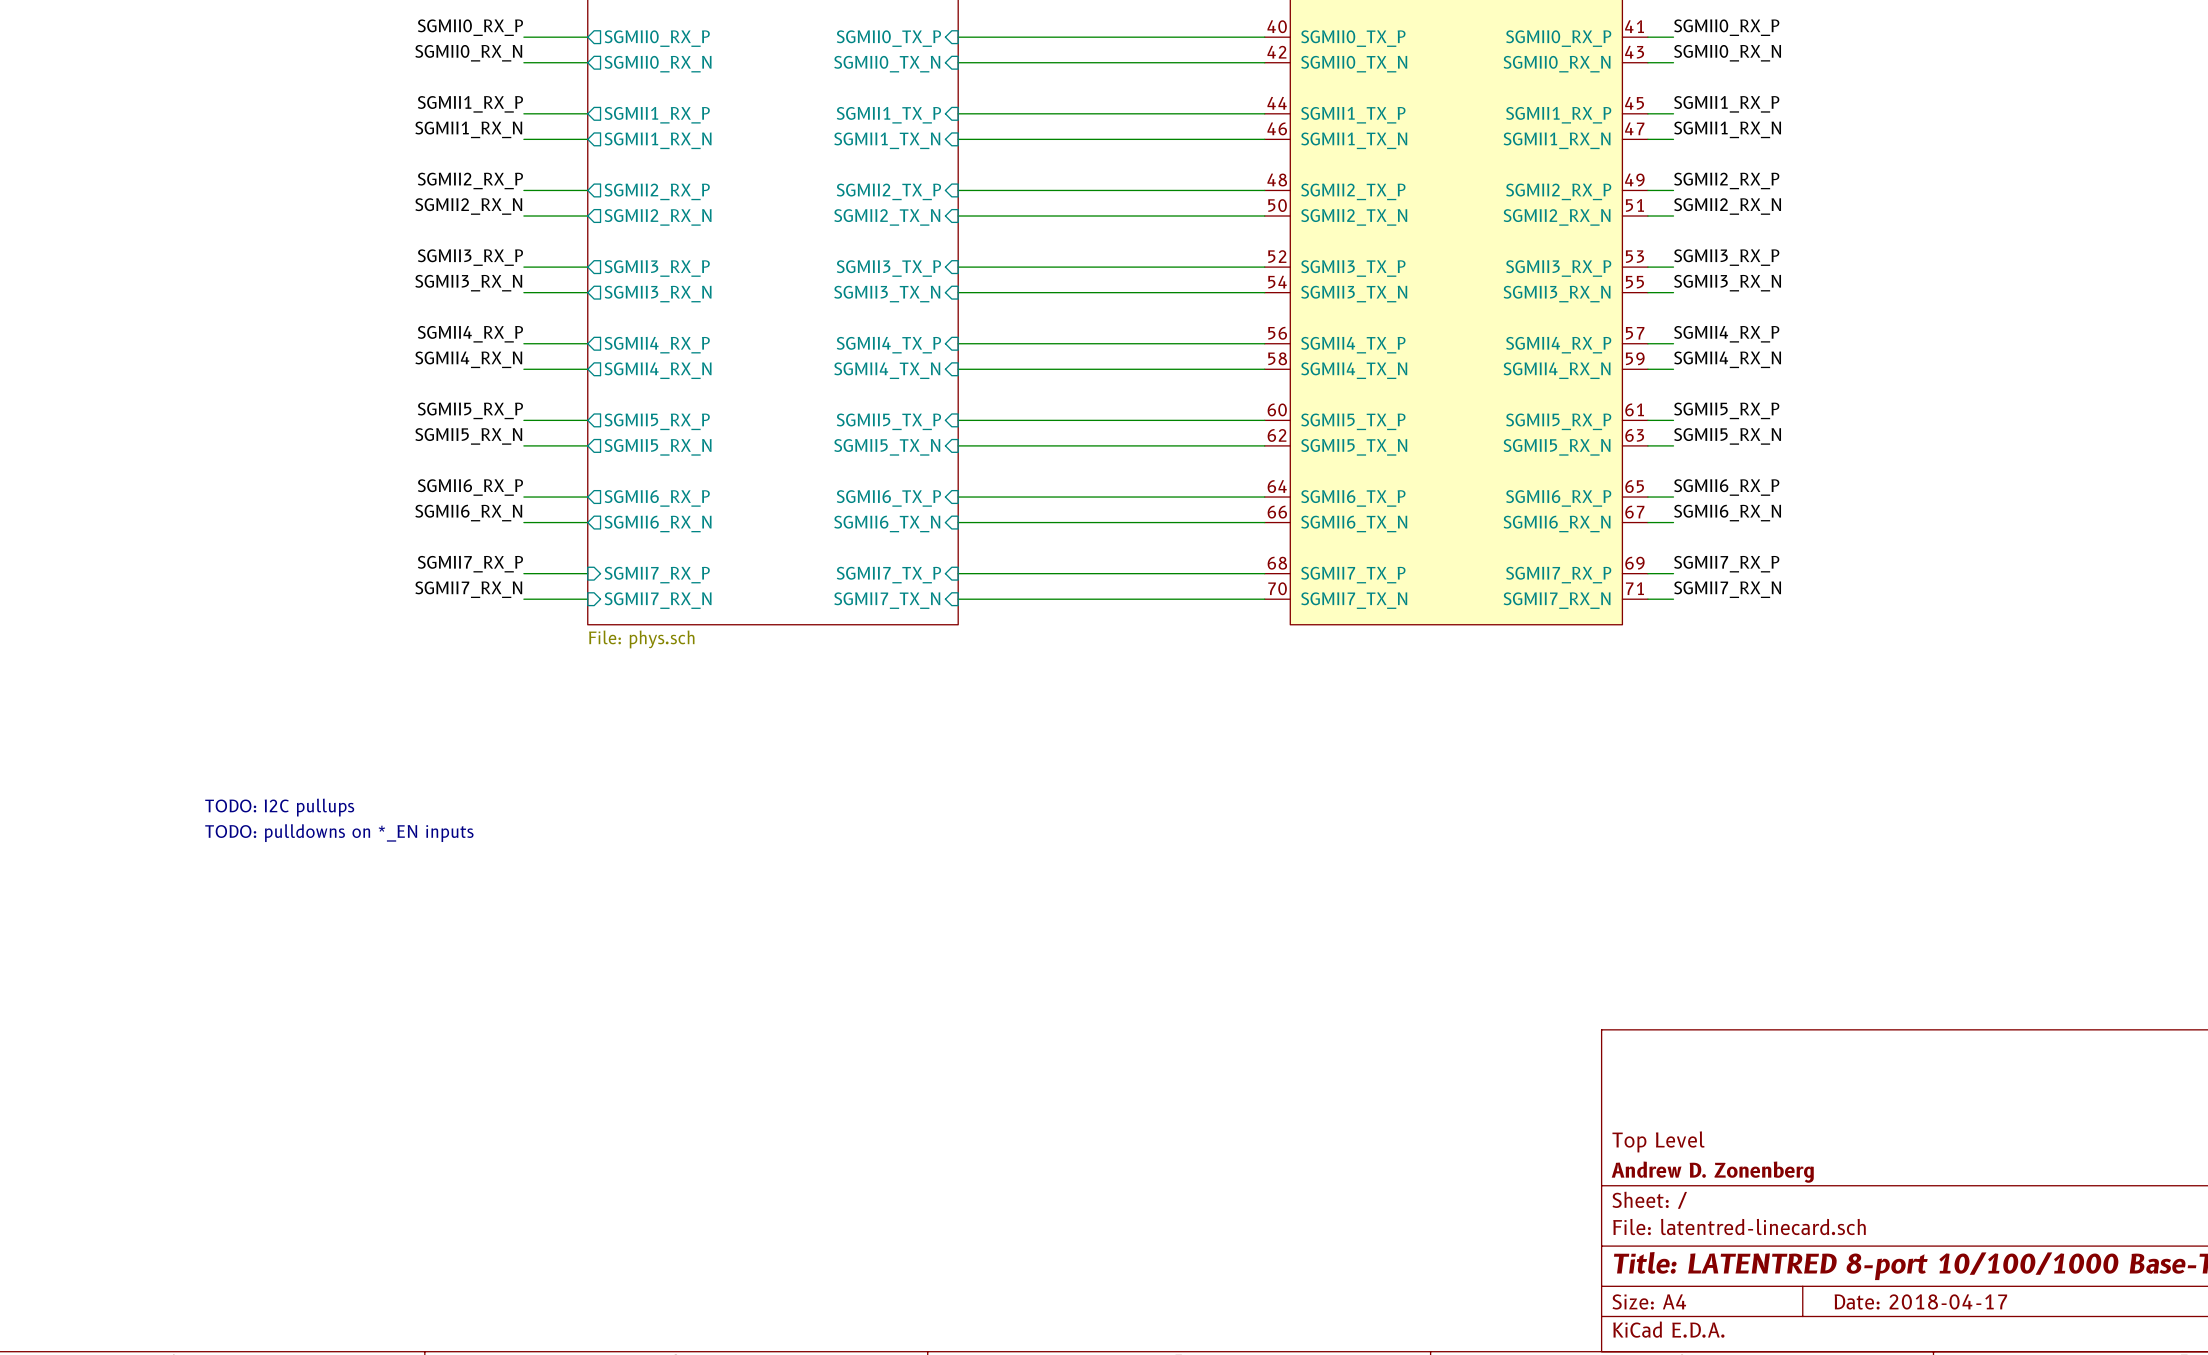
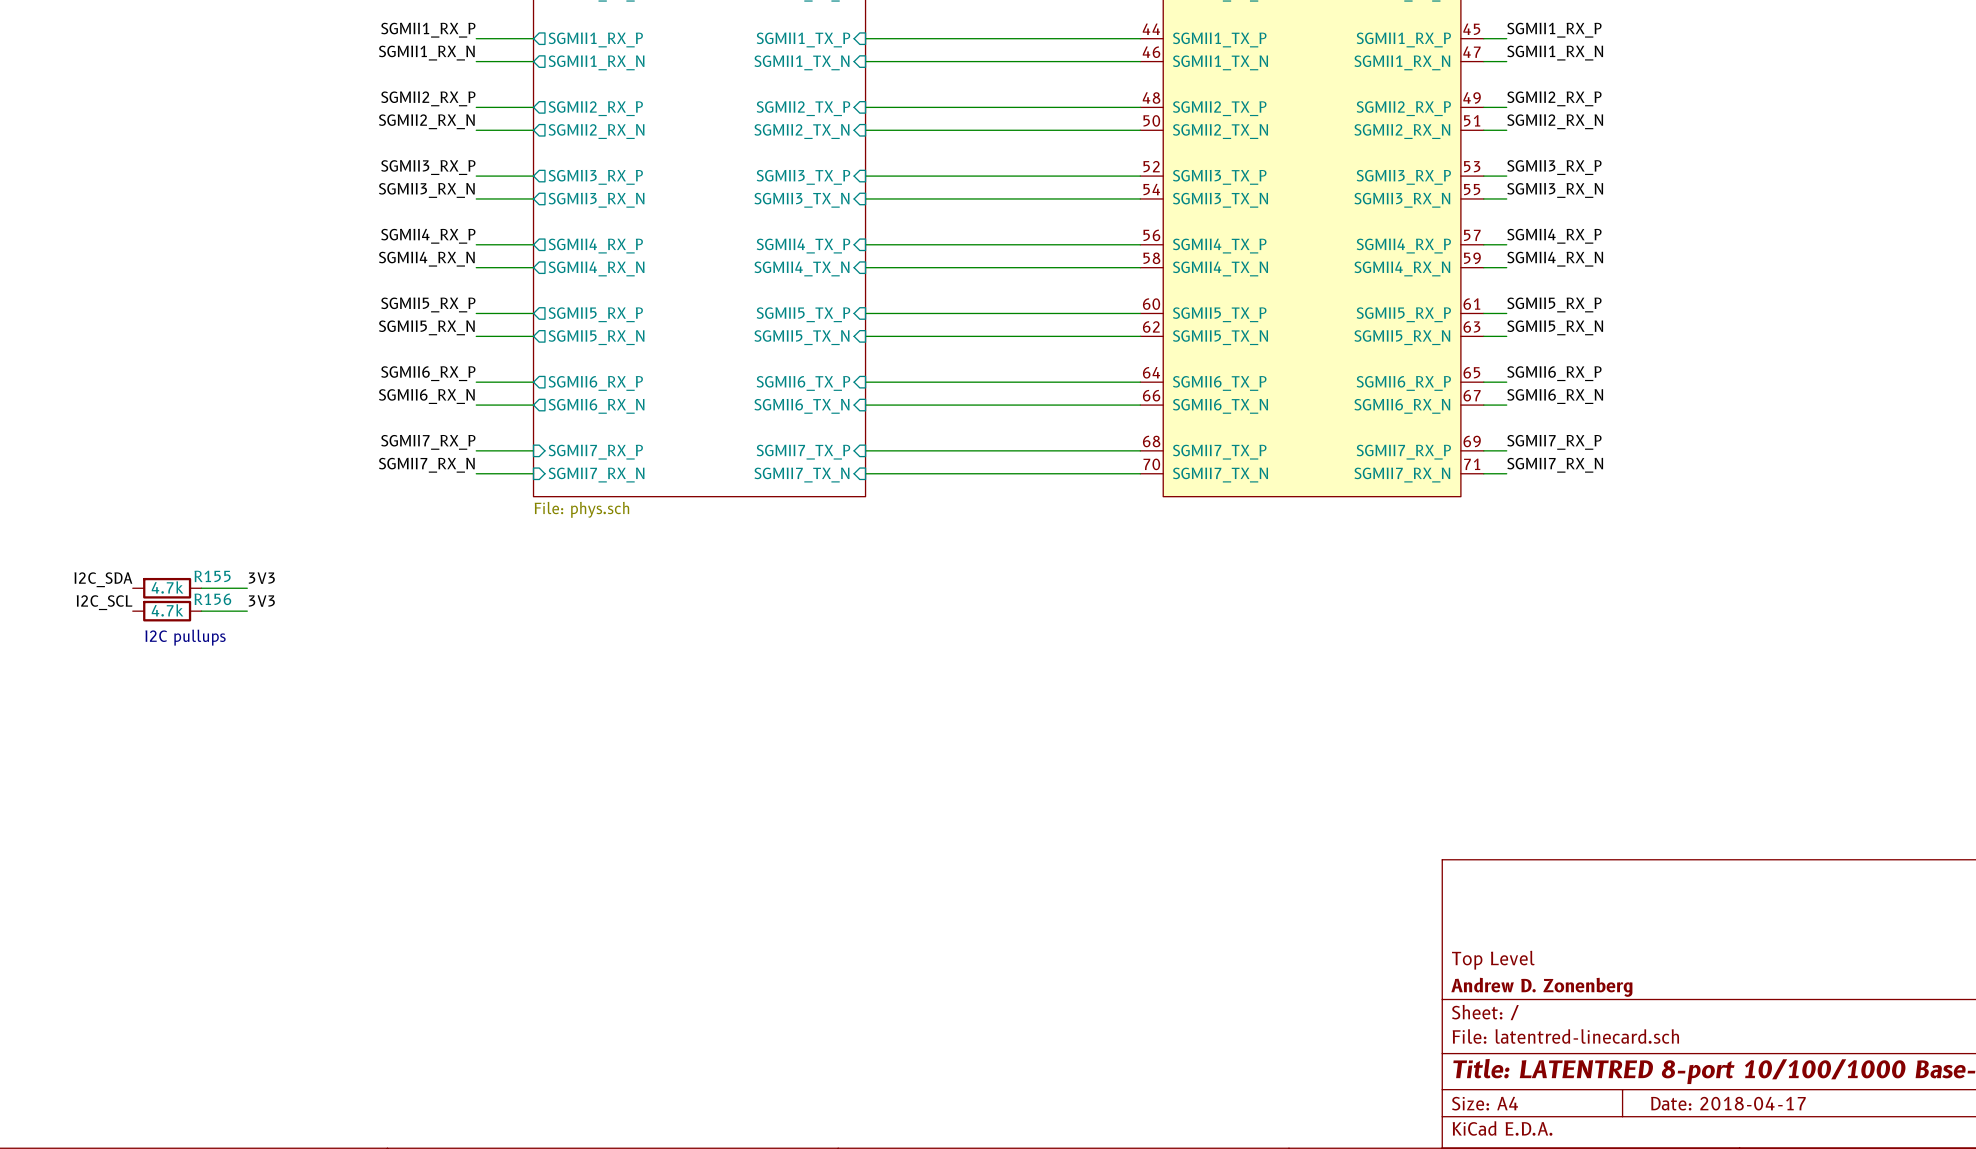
label: none -> 3V3 (261, 578)
label: none -> I2C_SDA (103, 579)
R155: none -> 4.7k (167, 588)
wire: none -> (201, 588) (247, 588)
label: none -> 3V3 (261, 601)
label: none -> I2C_SCL (104, 602)
R156: none -> 4.7k (167, 611)
wire: none -> (201, 611) (247, 611)
text: TODO: I2C pullups (279, 807) -> I2C pullups (185, 637)
text: TODO: pulldowns on *_EN inputs (339, 833) -> none

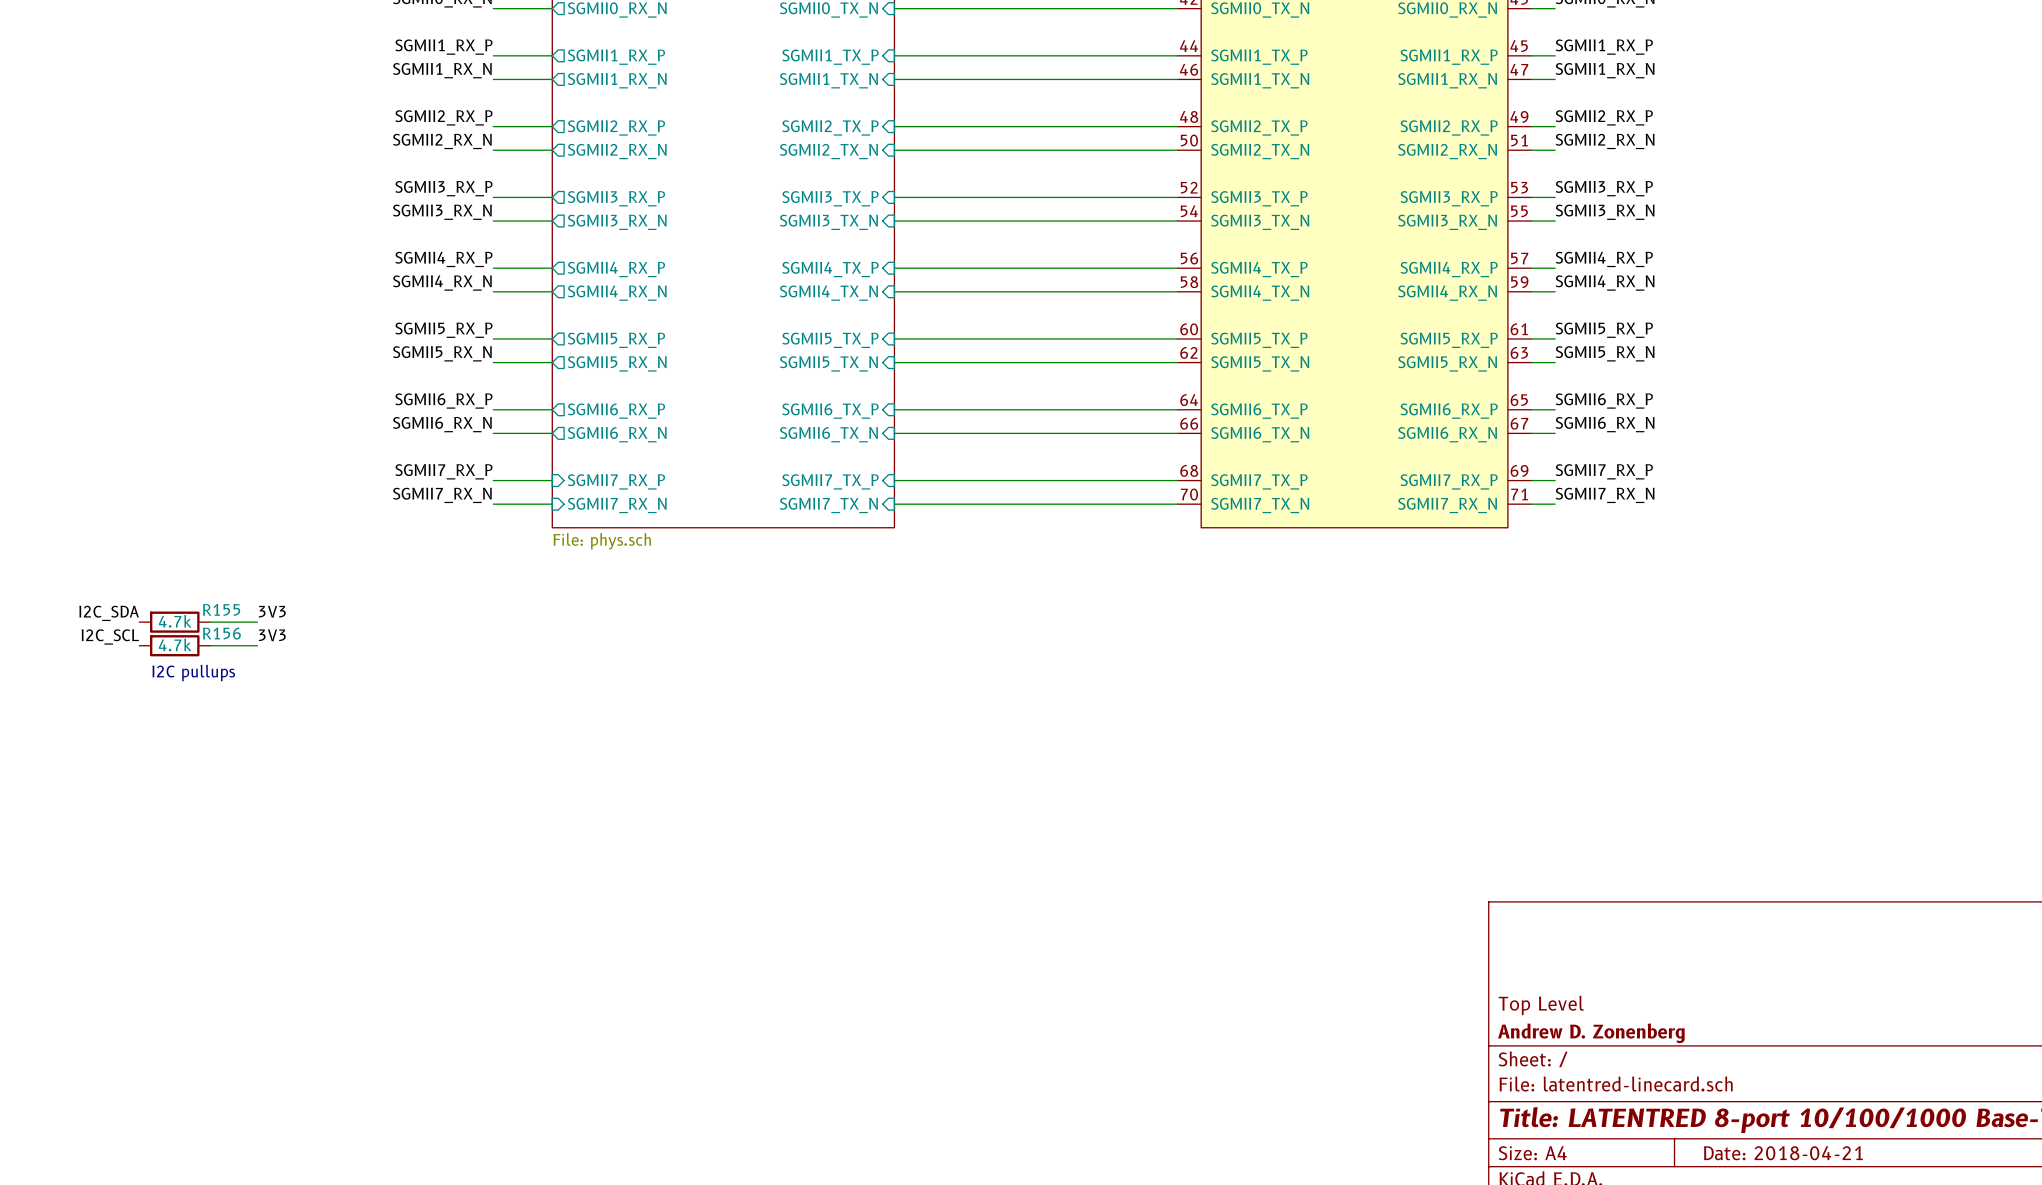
title block: Date: 2018-04-17 (1728, 1103) -> Date: 2018-04-21 (1783, 1153)

